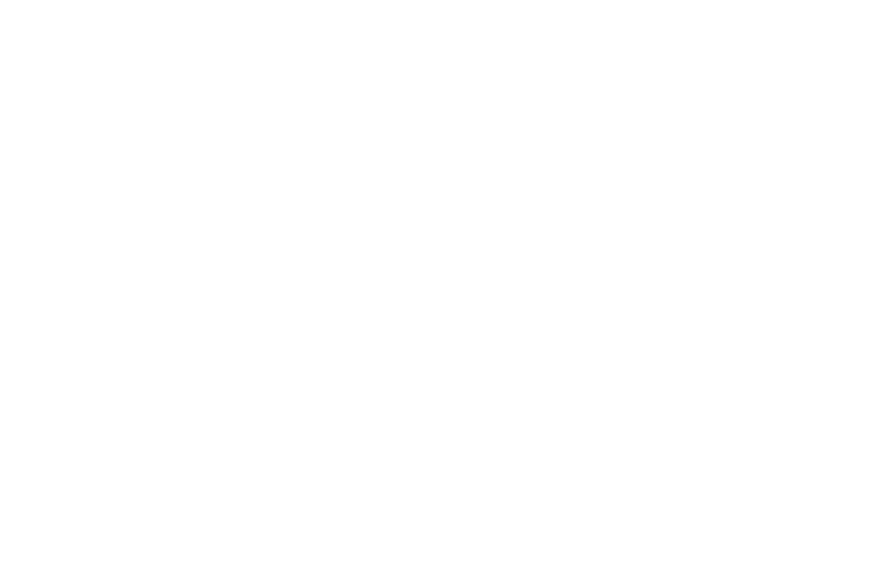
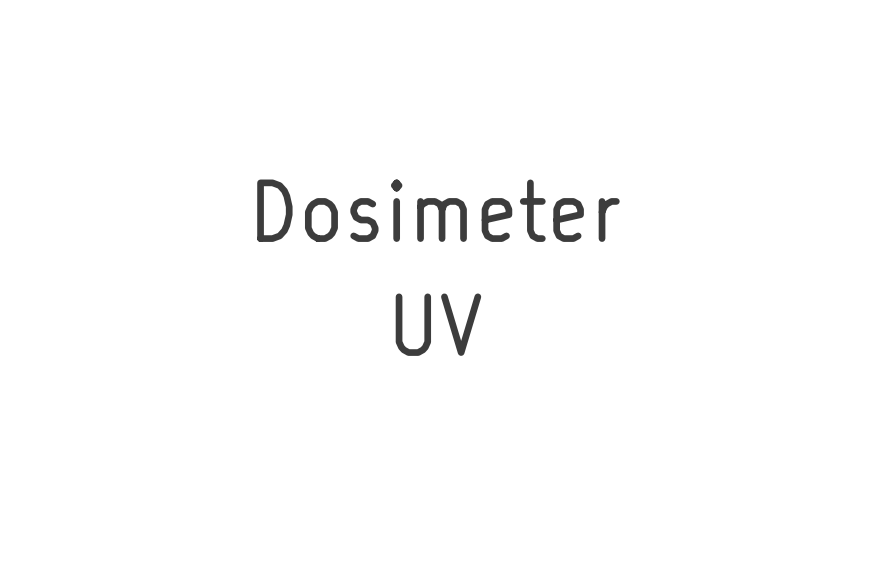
text: none -> Dosimeter (438, 210)
text: none -> UV (438, 324)

